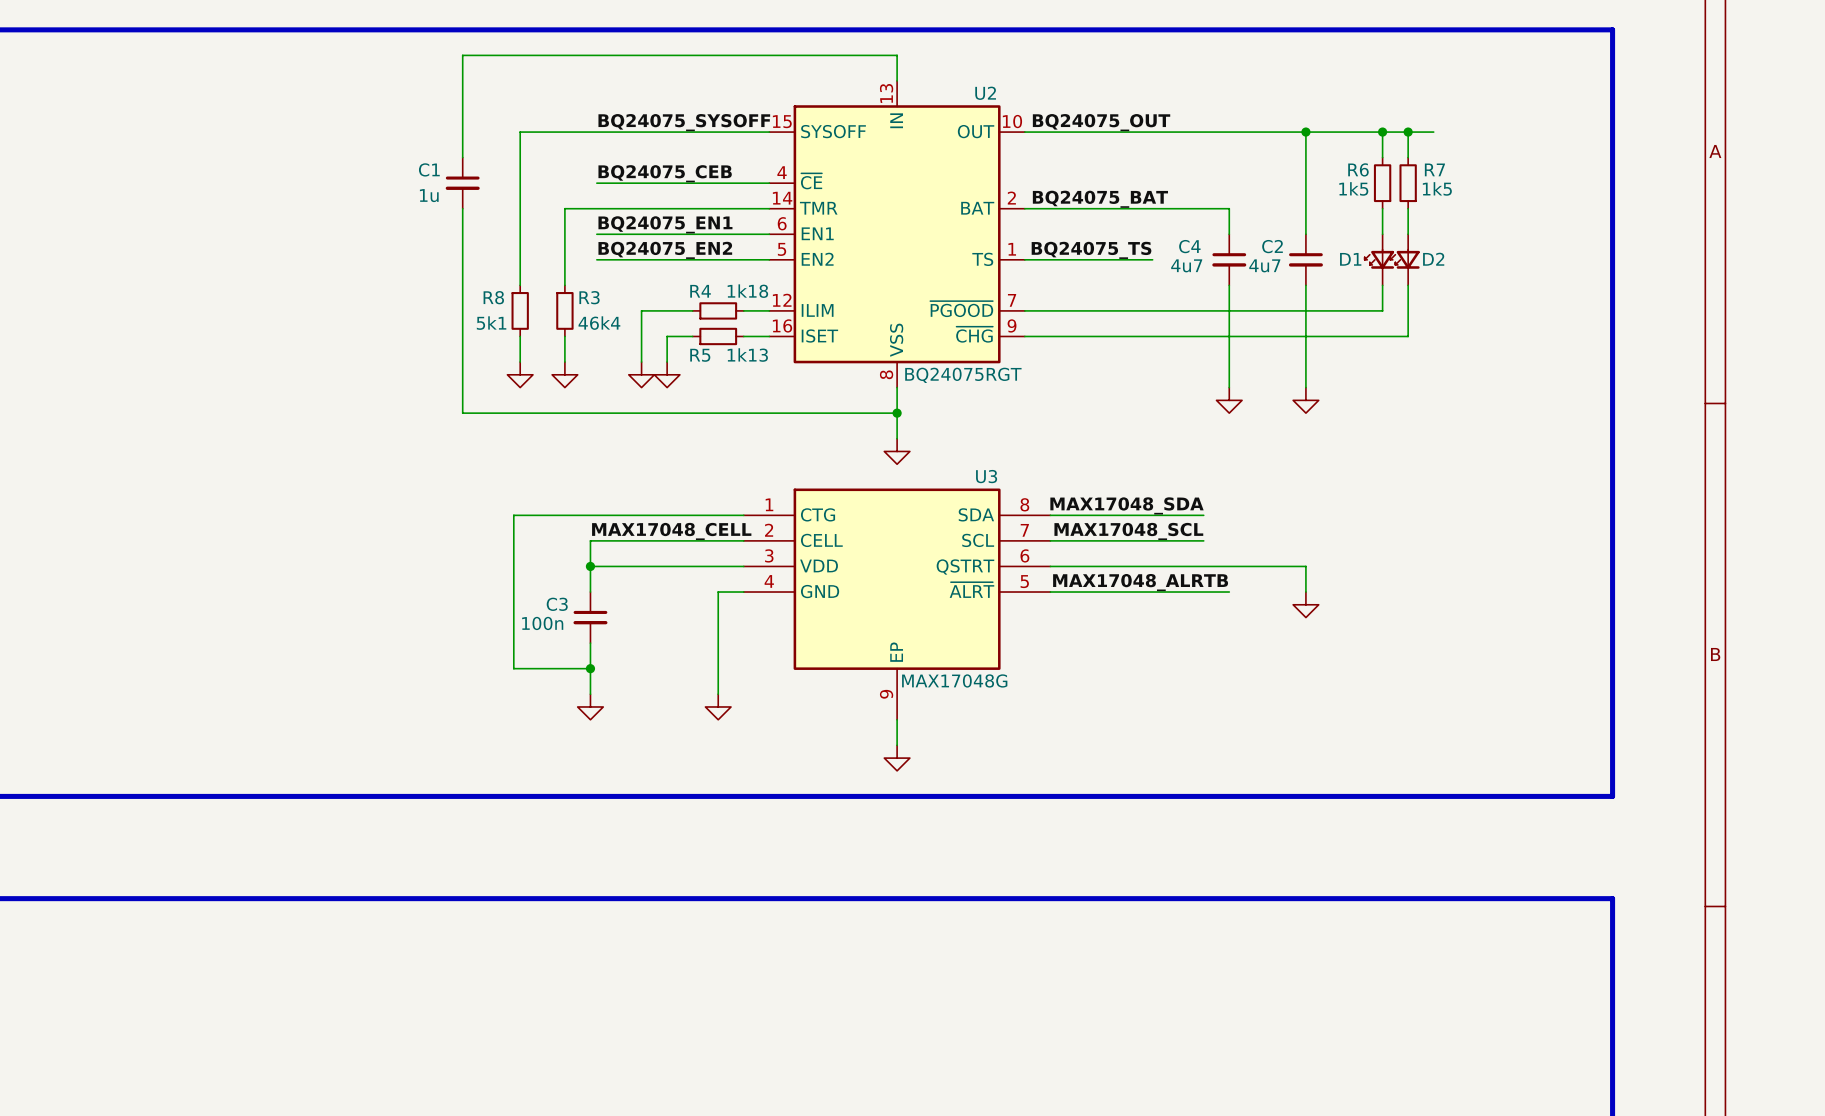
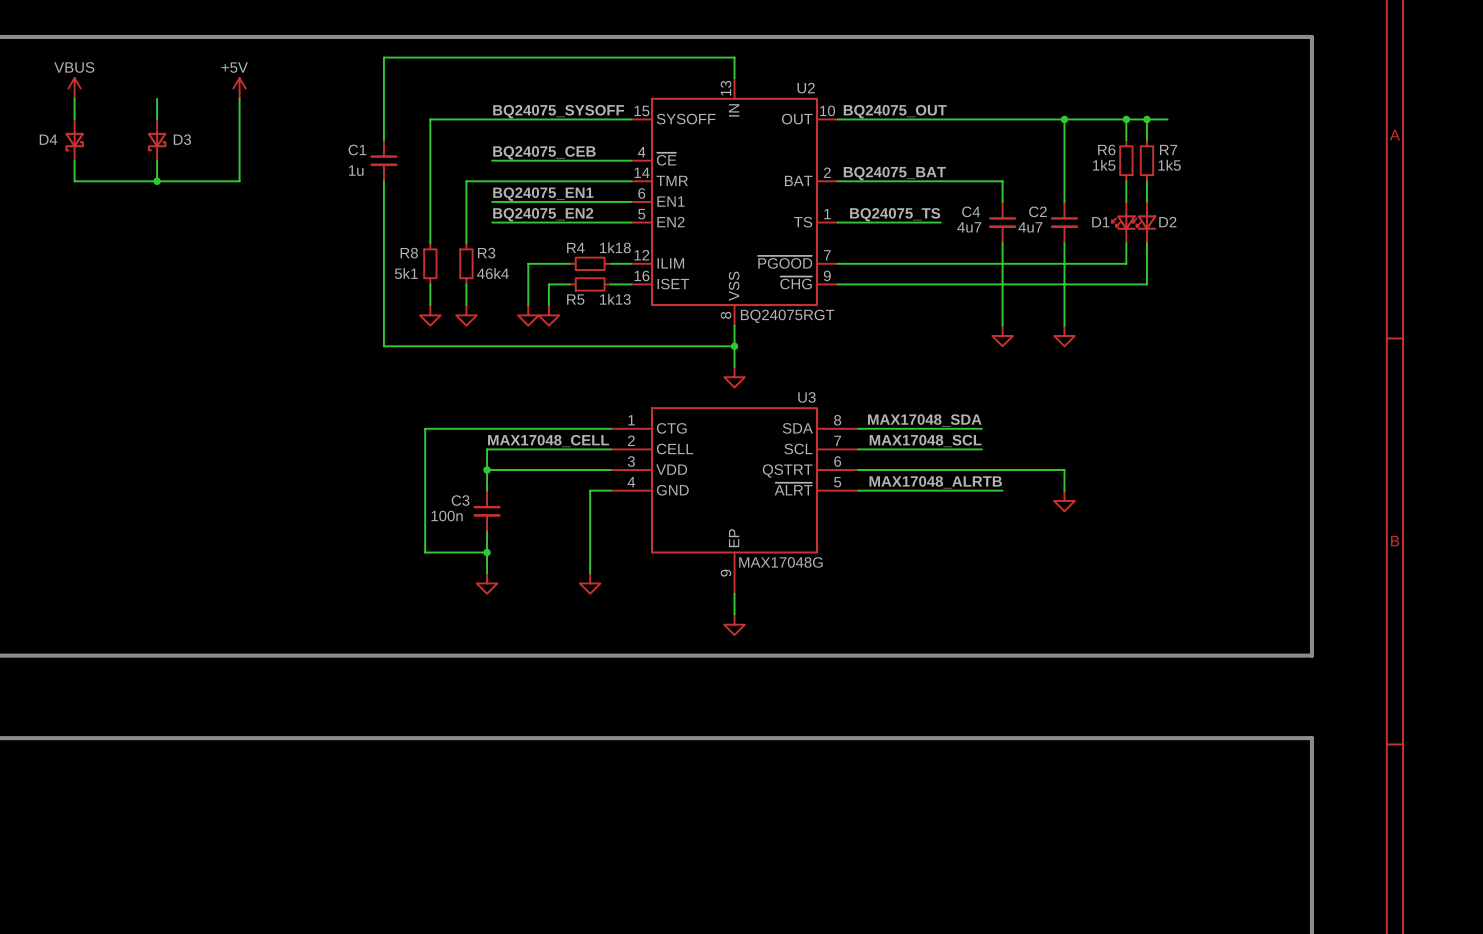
power symbol: none -> VBUS (74, 88)
power symbol: none -> +5V (239, 88)
wire: none -> (74, 98) (74, 119)
wire: none -> (157, 98) (157, 119)
wire: none -> (239, 98) (239, 181) (74, 181) (74, 160)
D4: none -> (74, 140)
D3: none -> (157, 140)
wire: none -> (157, 160) (157, 181)
junction: none -> (157, 181)

